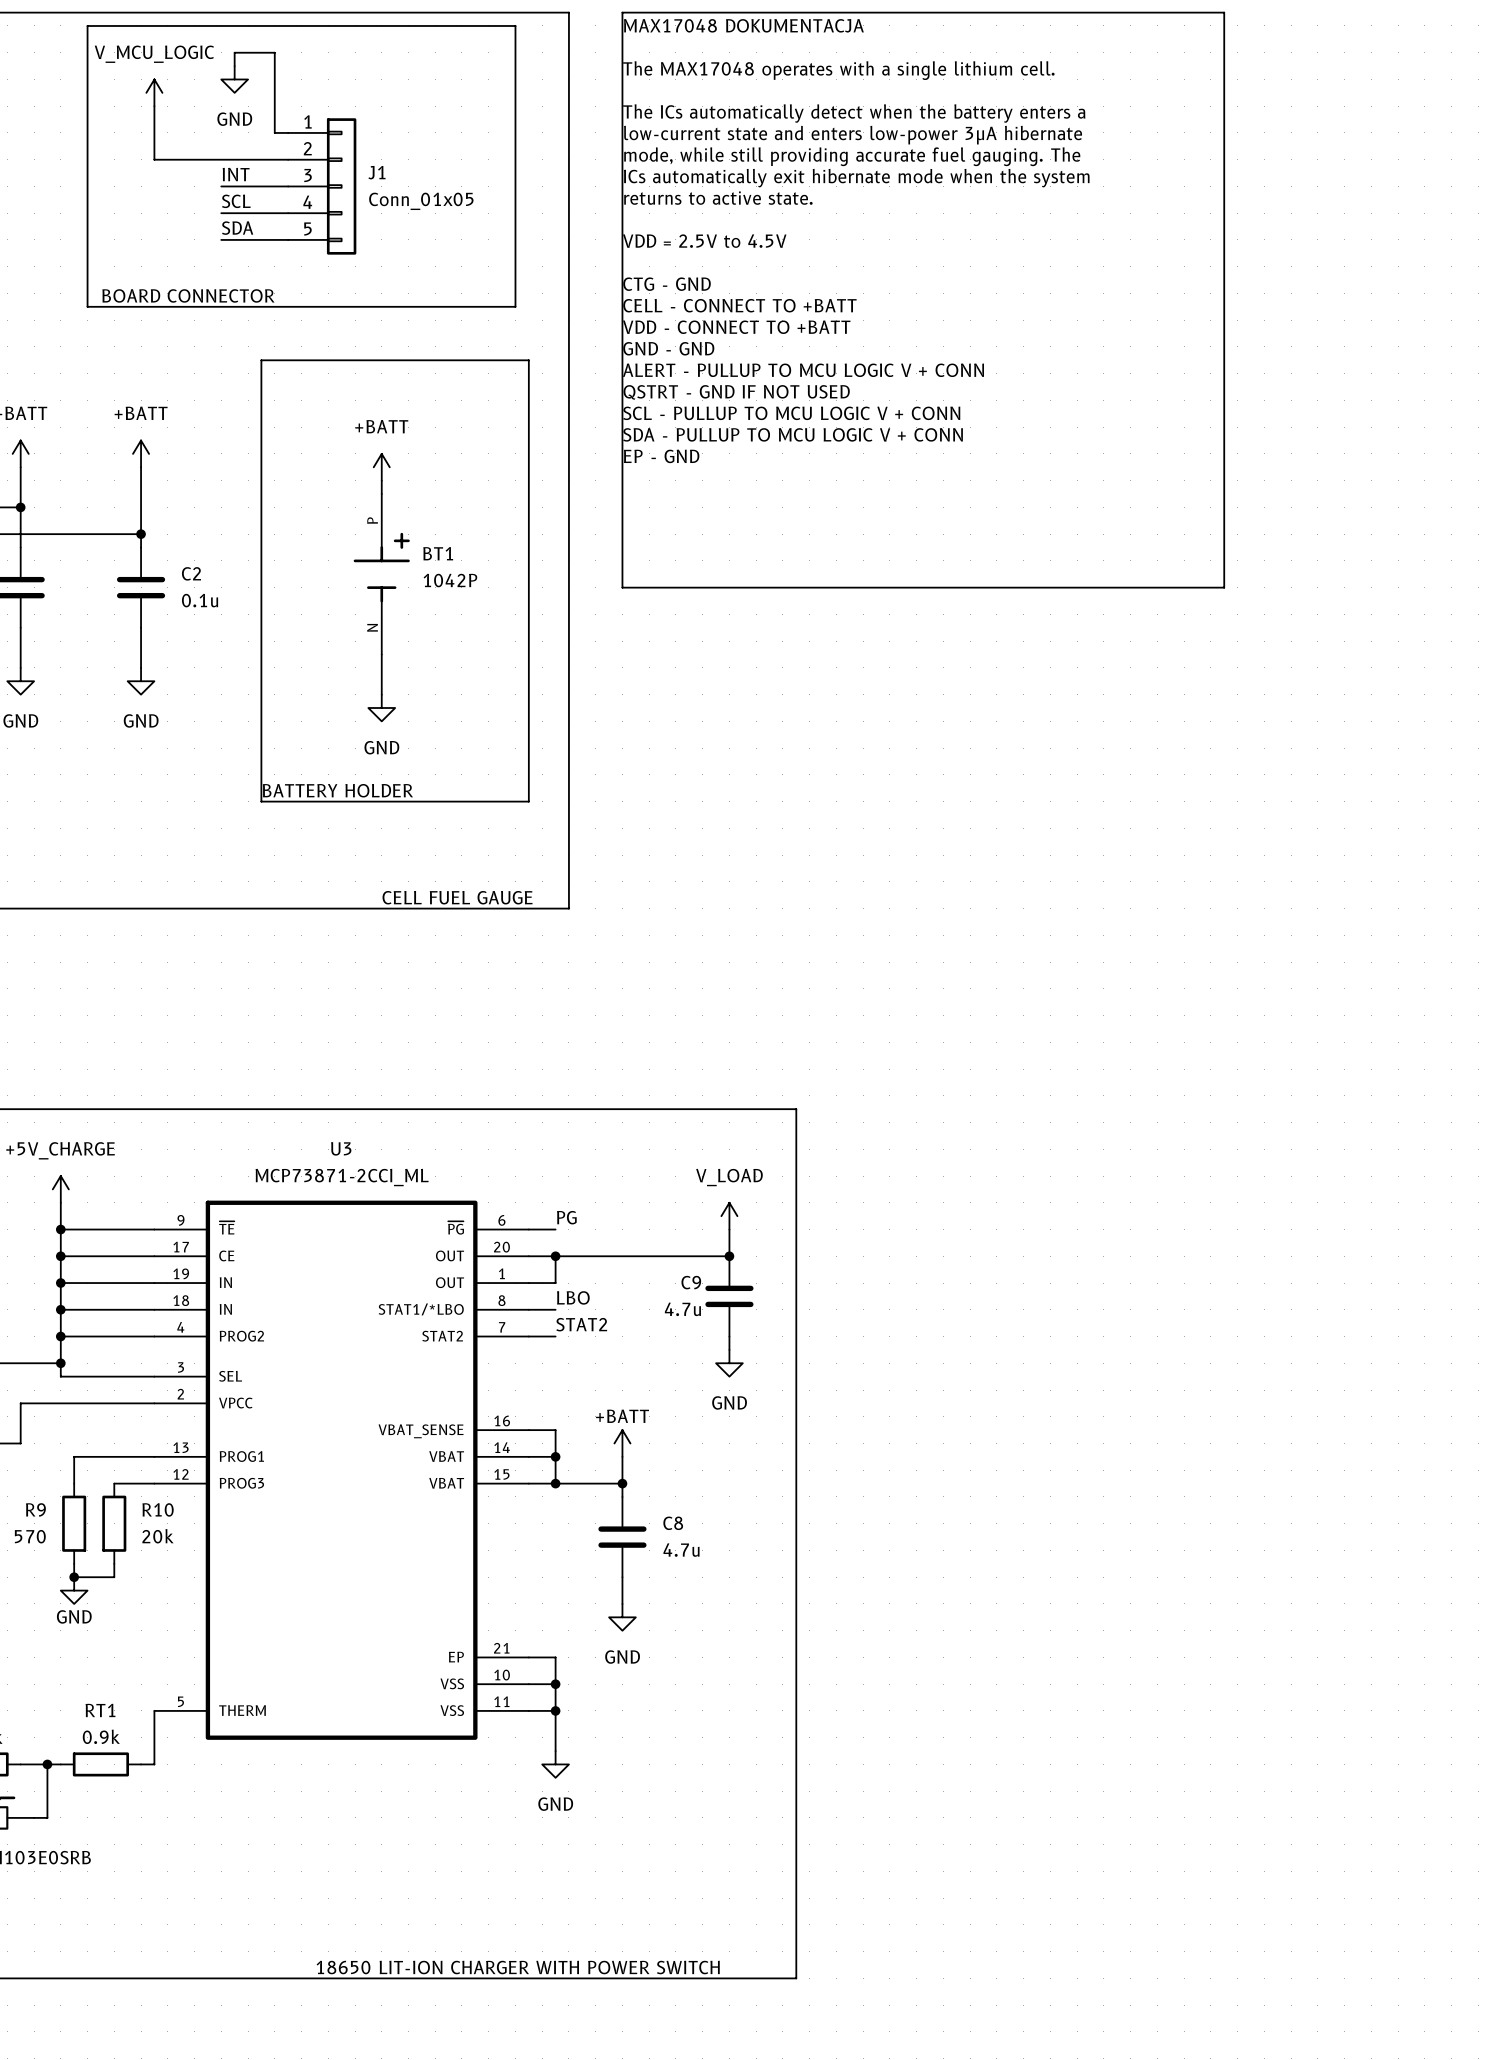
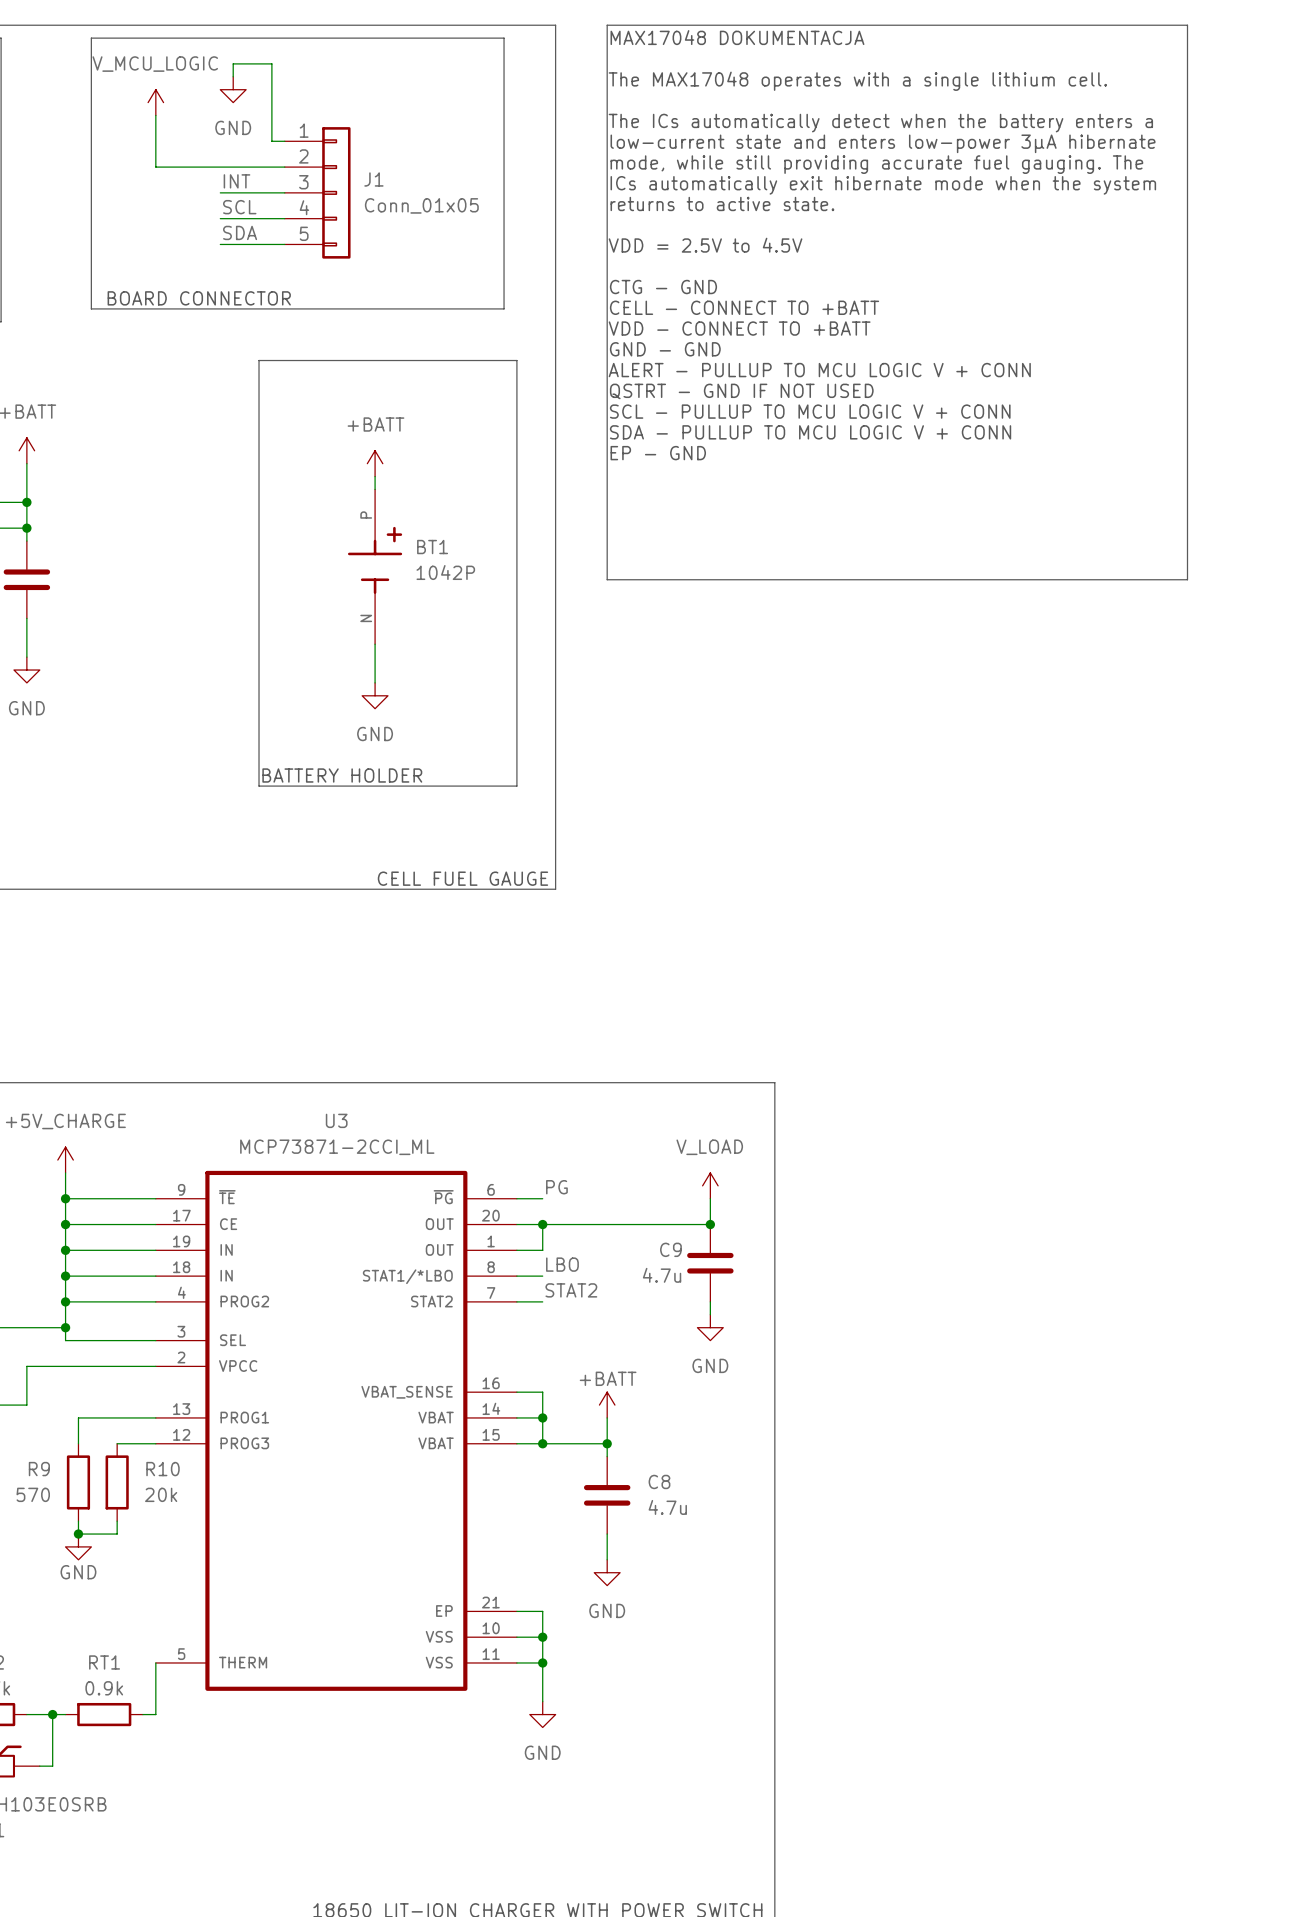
power symbol: +BATT (141, 453) -> none
wire: (141, 467) (141, 547) -> none
wire: (20, 534) (141, 534) -> none
junction: none -> (26, 528)
junction: (141, 534) -> none
C2: 0.1u (141, 587) -> none
wire: (141, 627) (141, 667) -> none
power symbol: GND (141, 681) -> none

